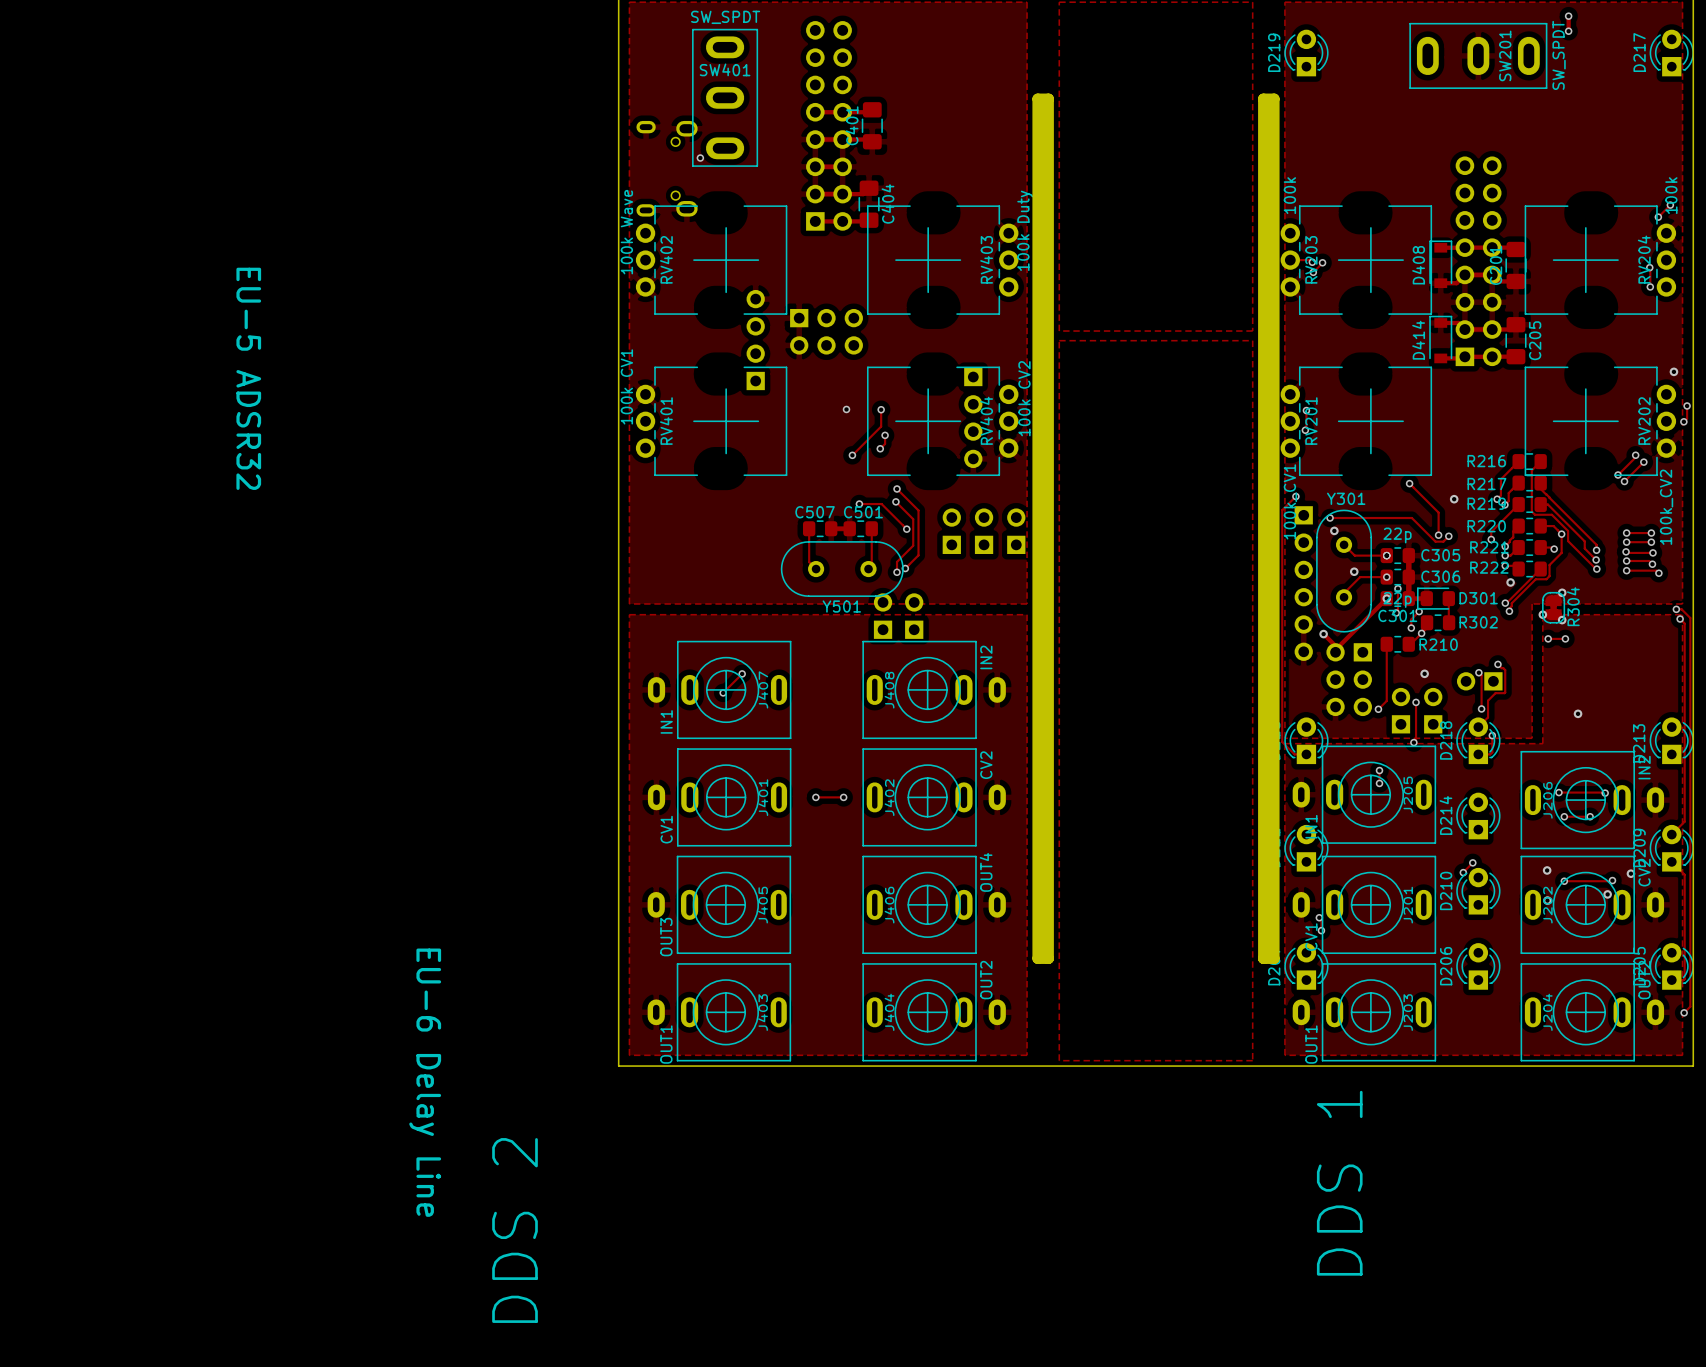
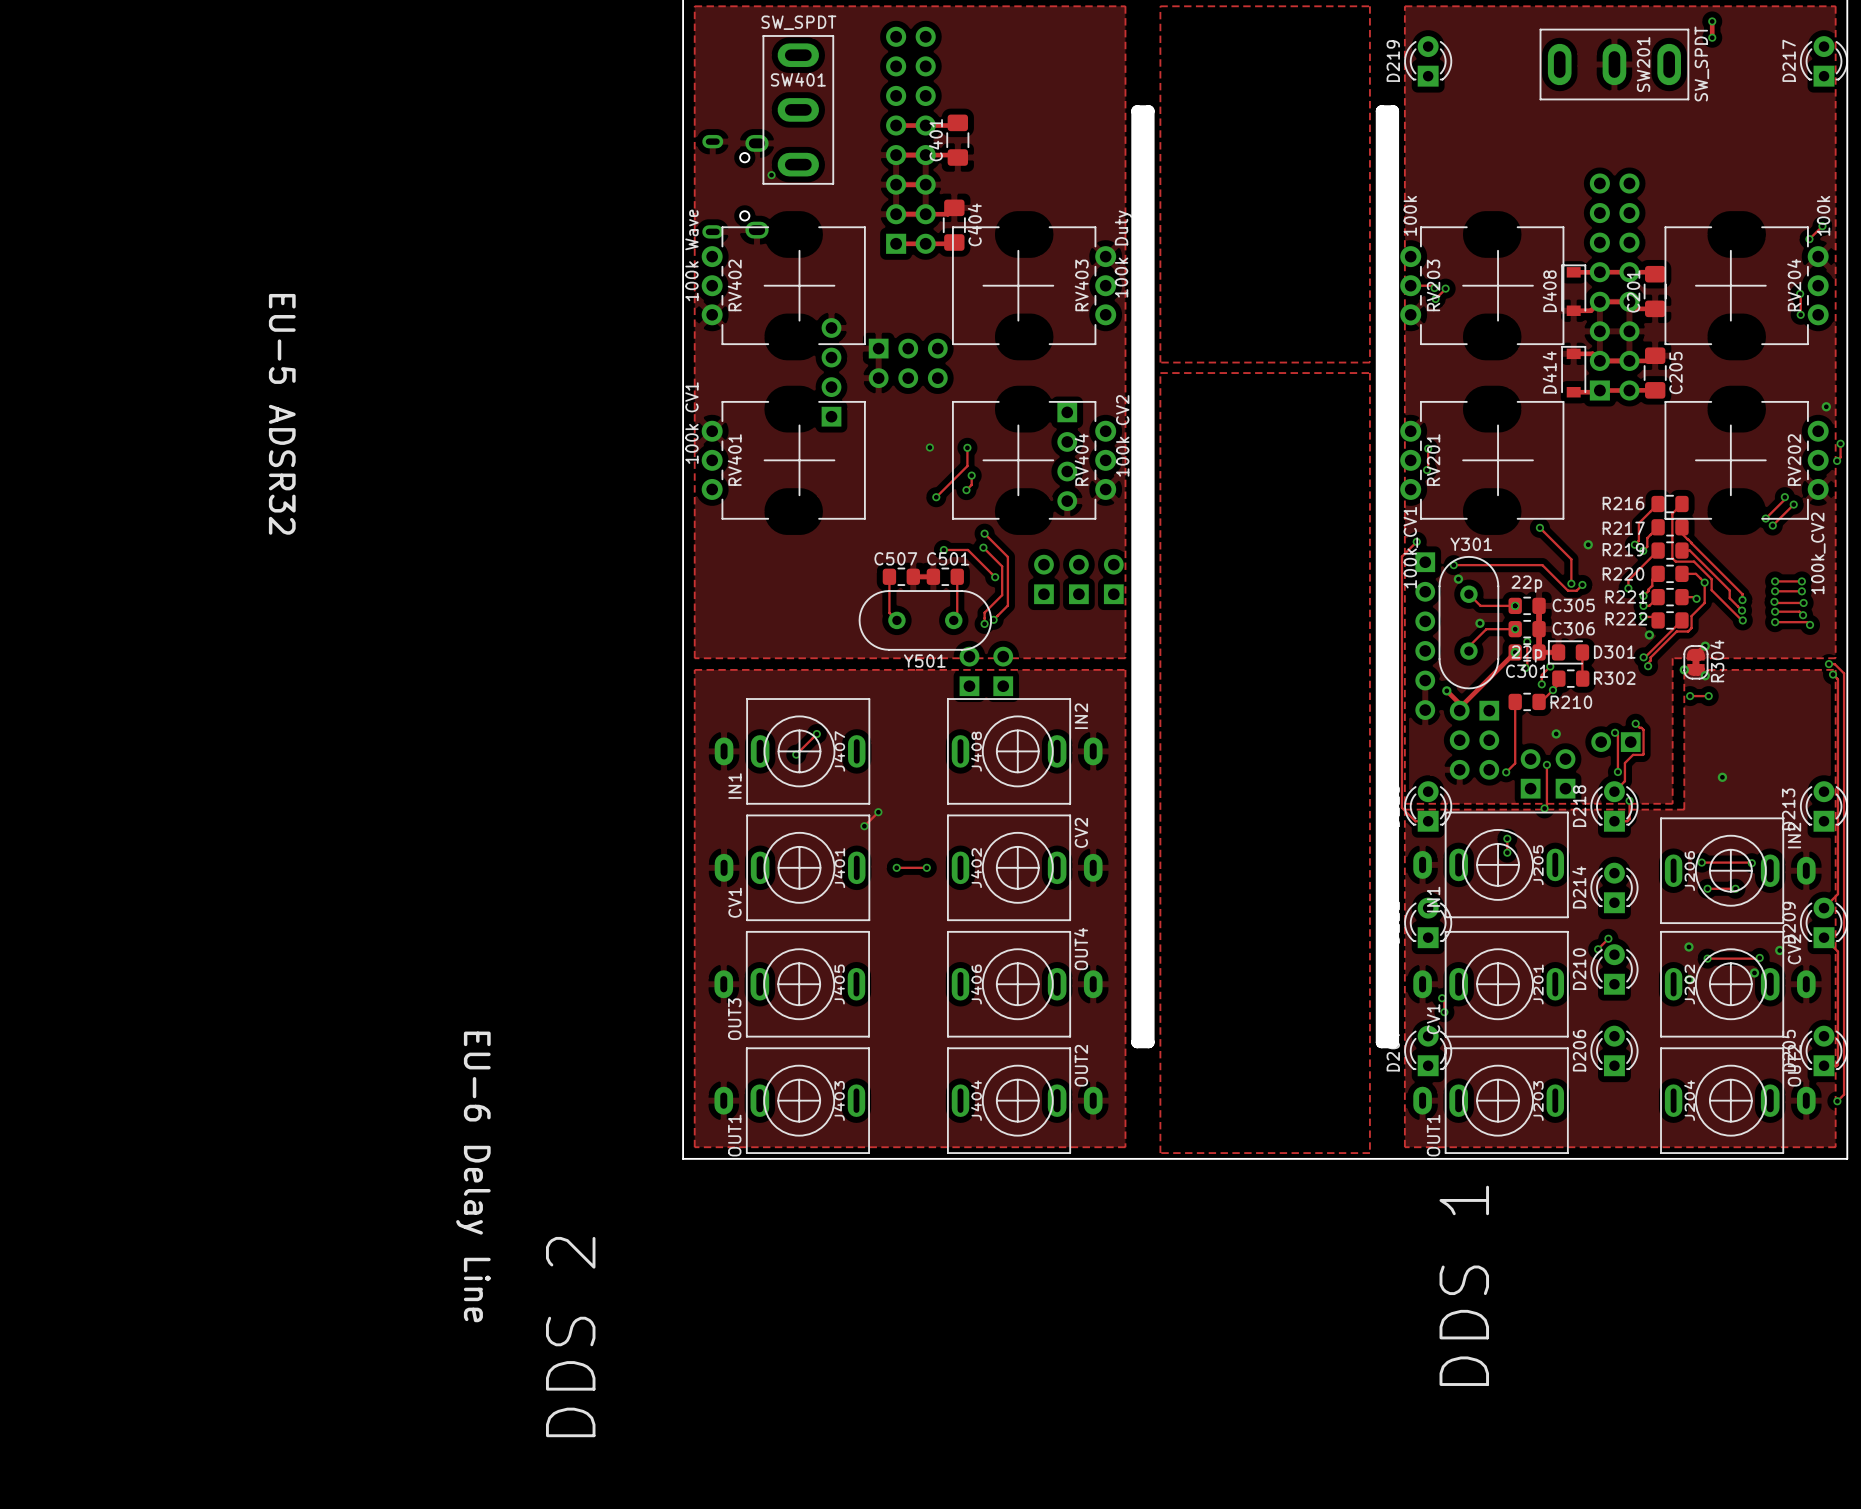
track: none -> (878, 812) (864, 826)
via: none -> (878, 812)
via: none -> (864, 826)

